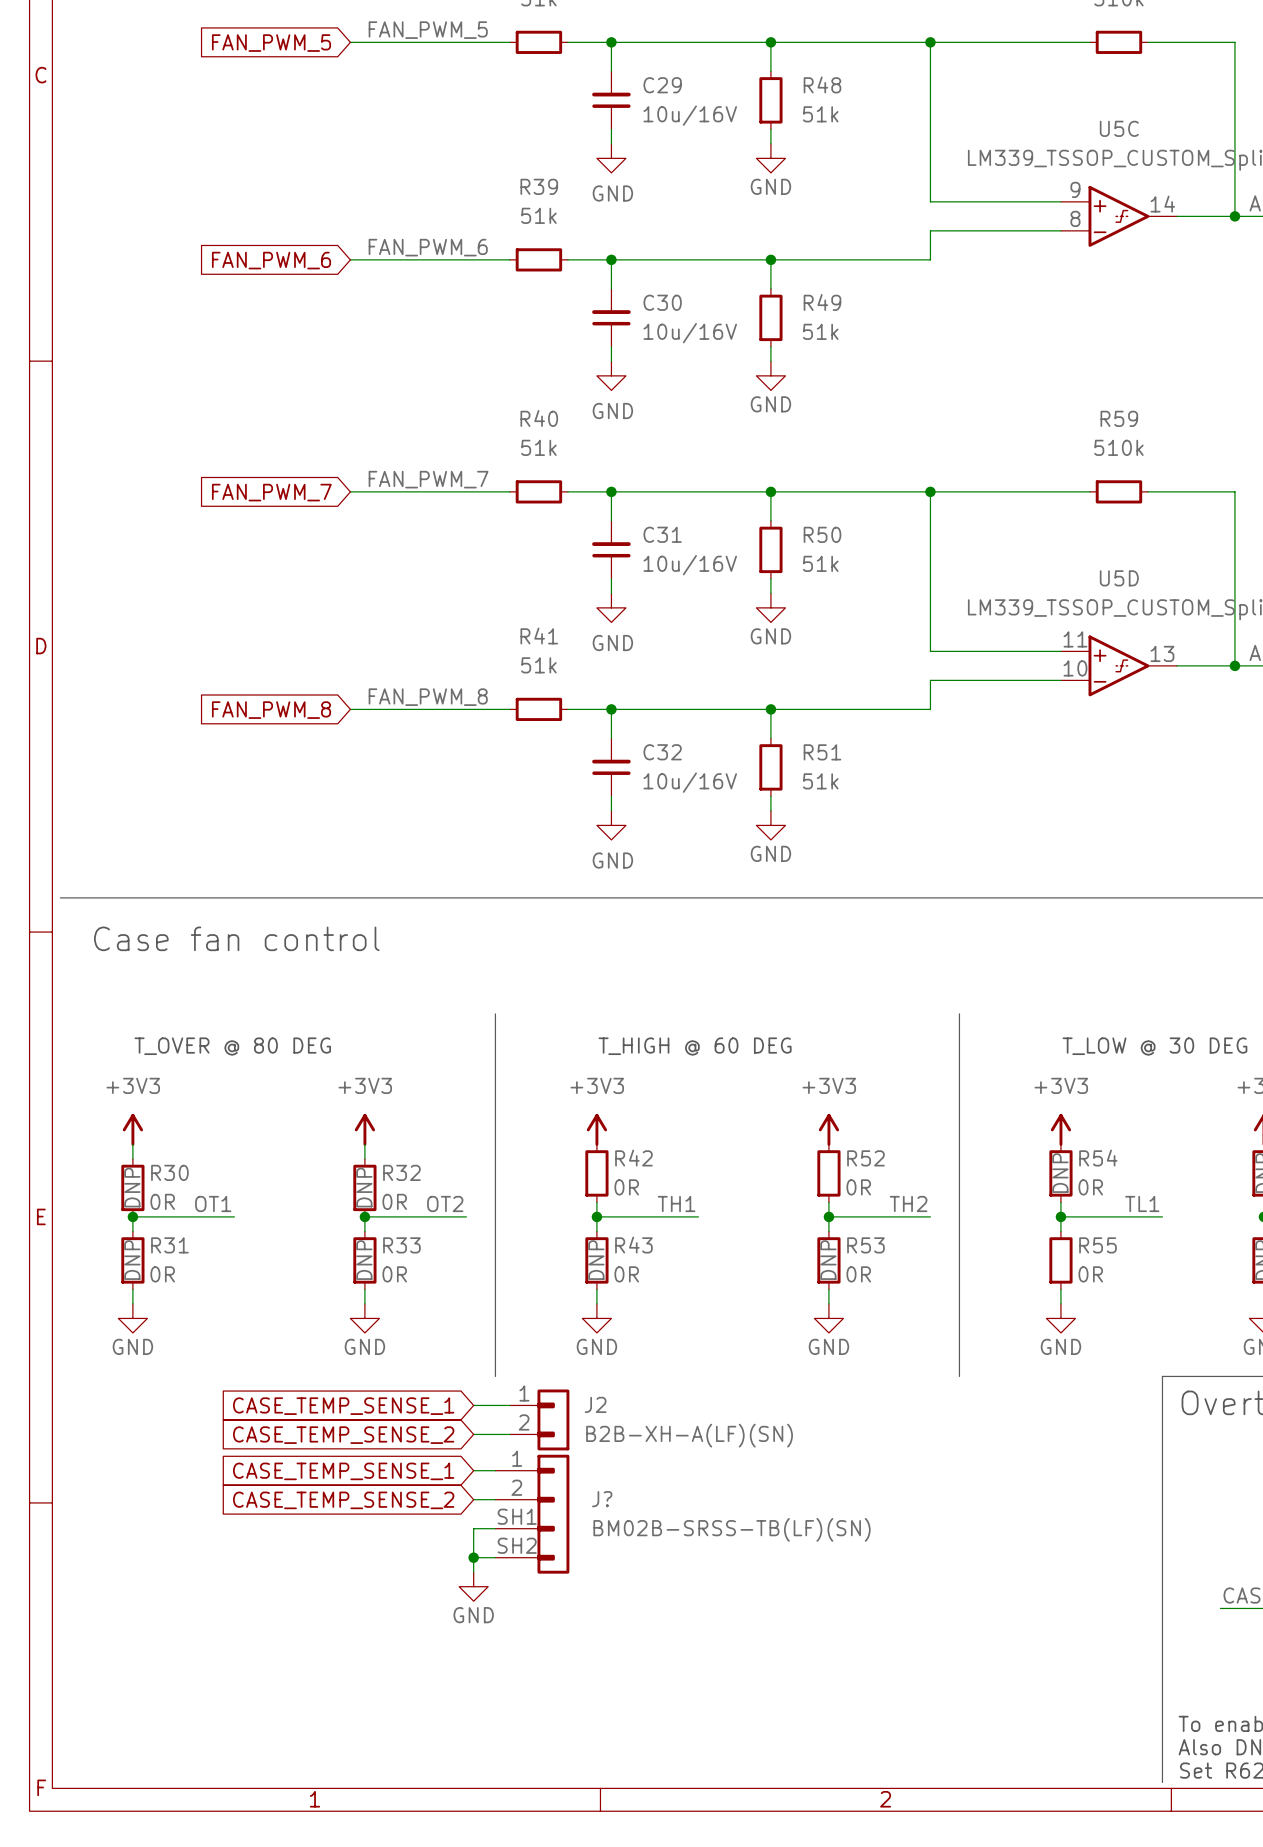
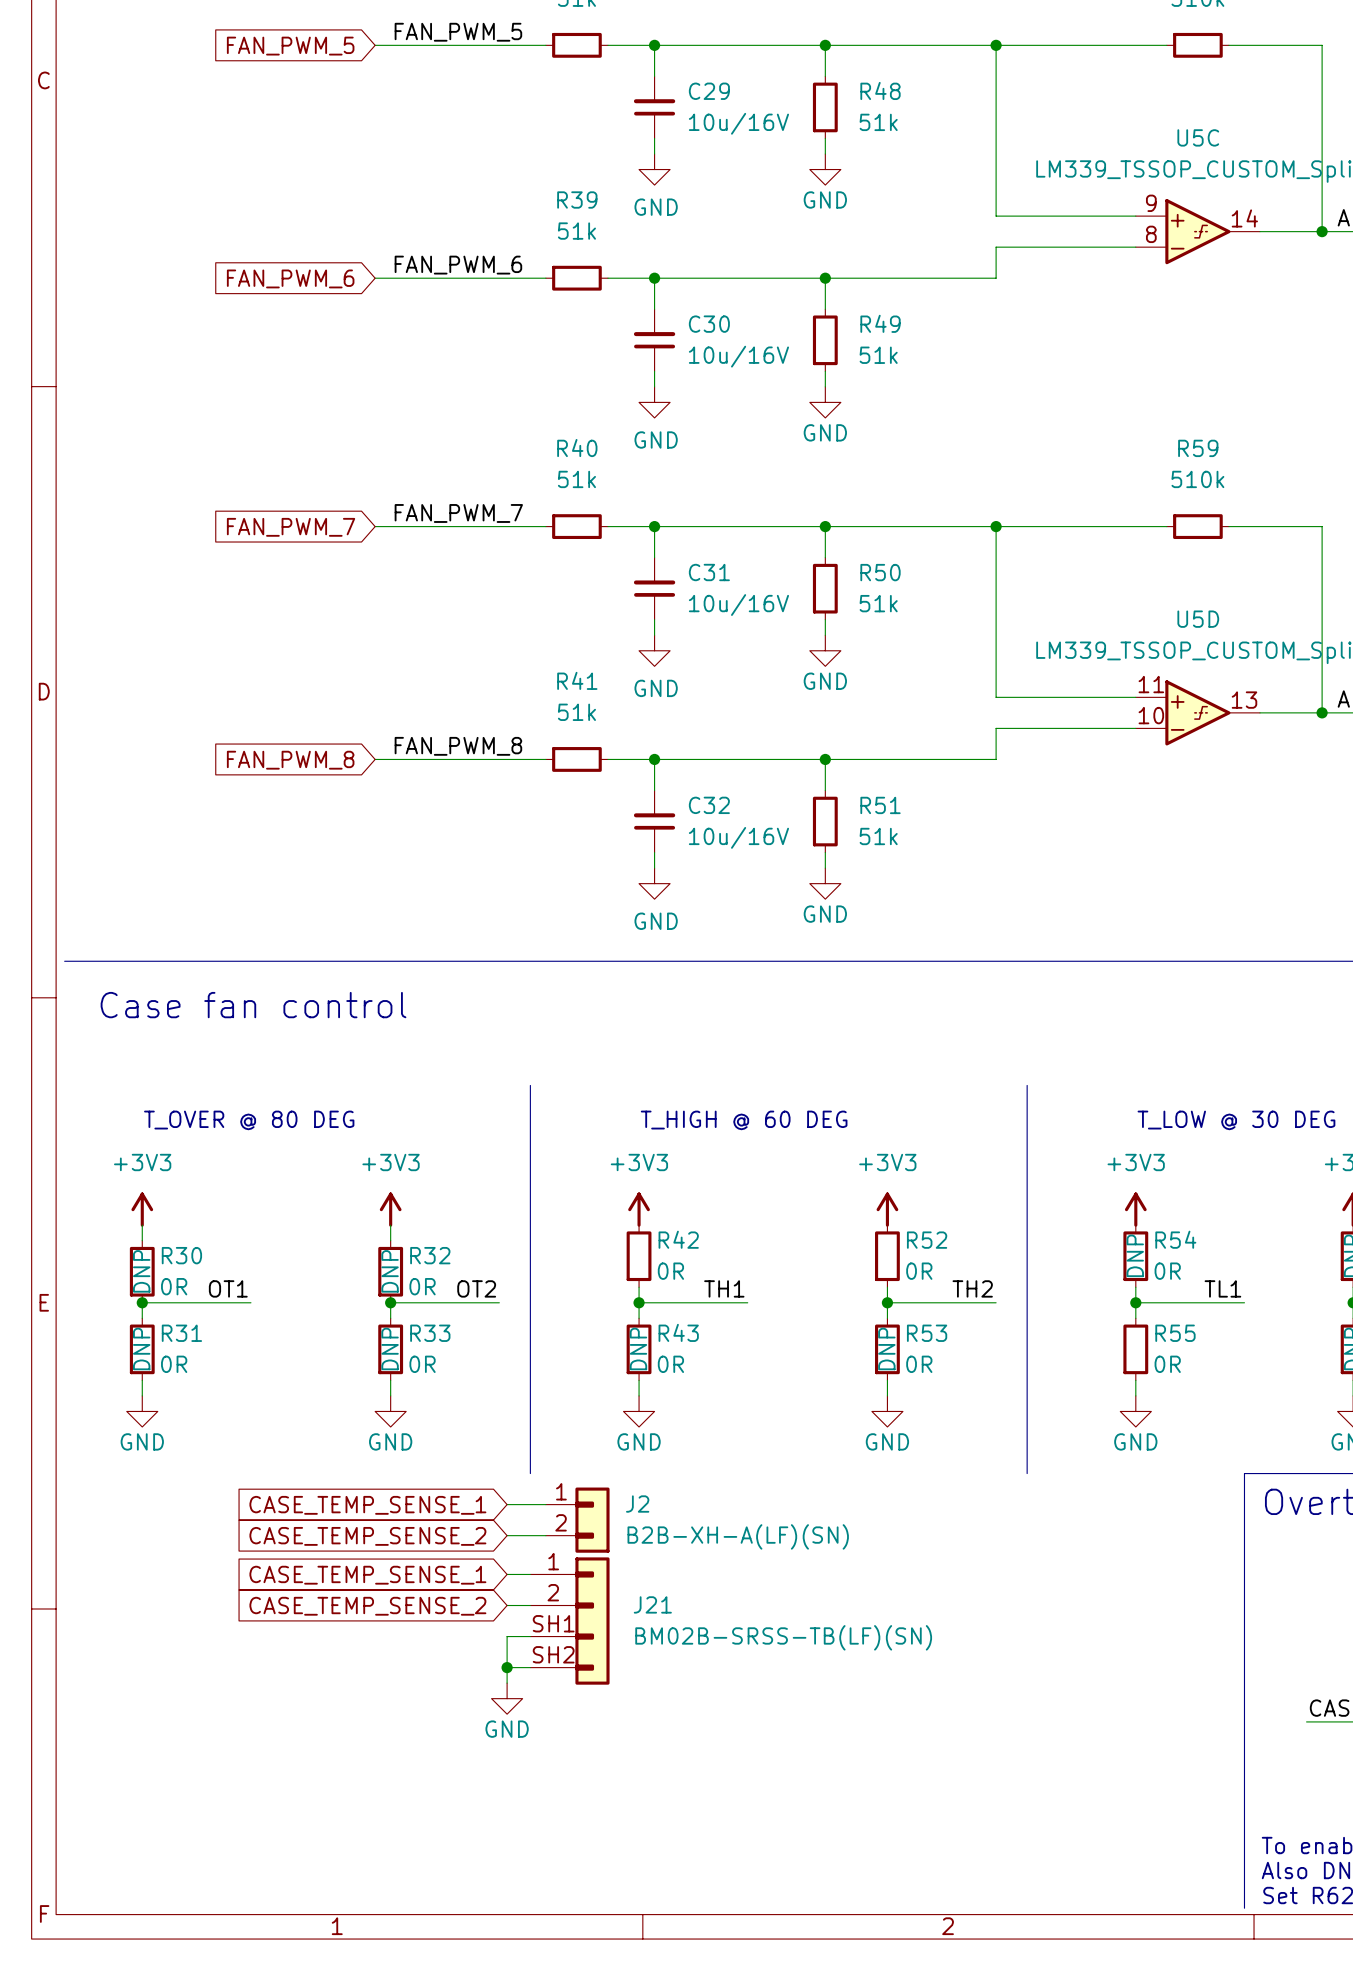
J? name: J? (602, 1499) -> J21 (652, 1604)

